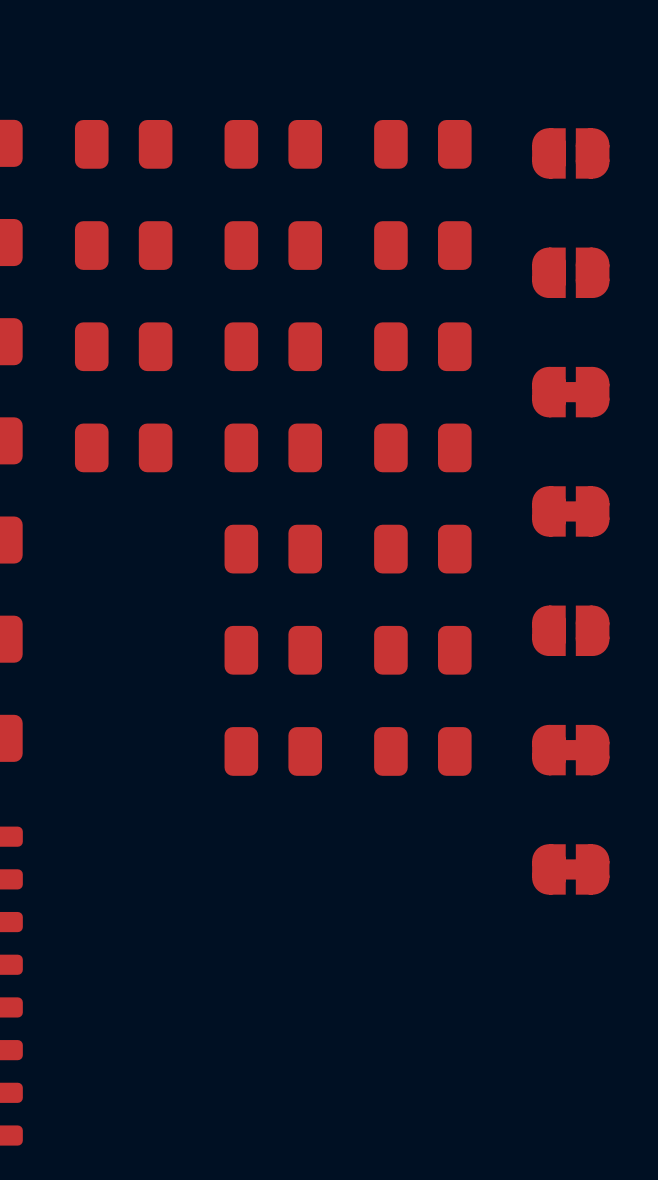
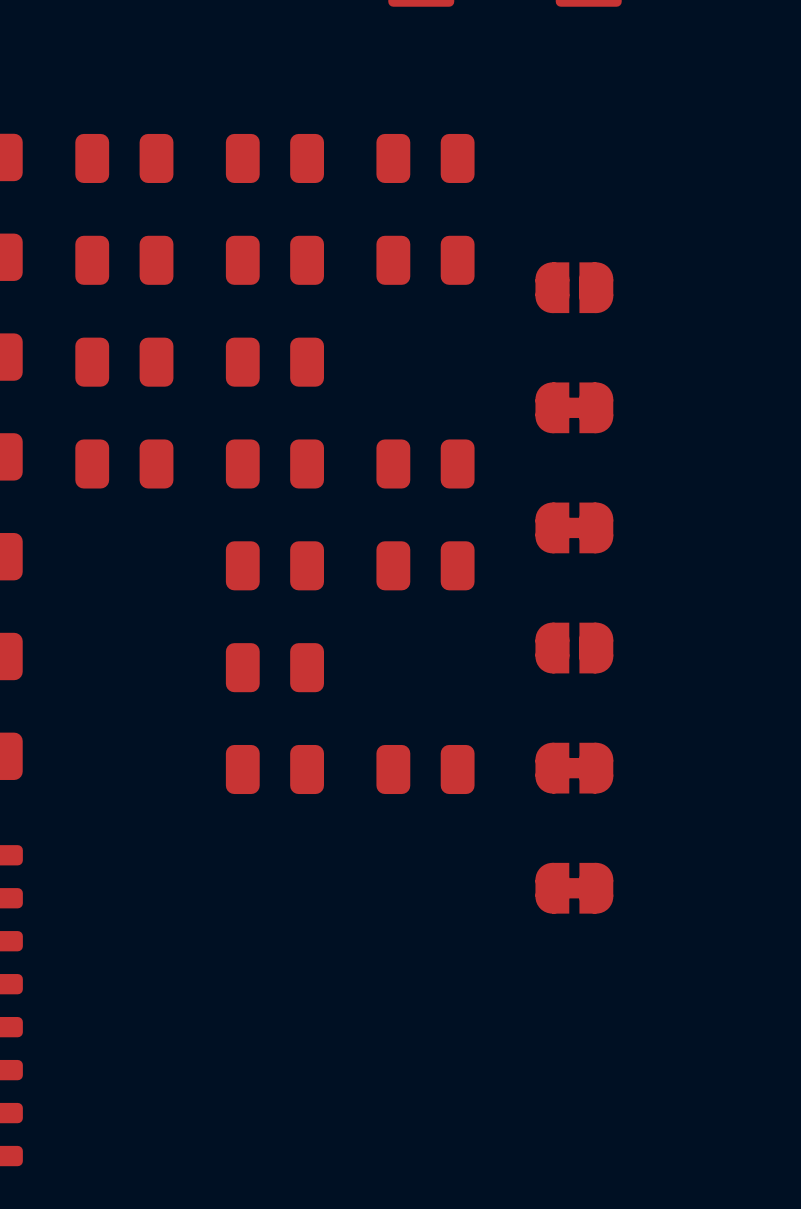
part: (570, 153) -> none
part: (422, 346) -> none
part: (422, 650) -> none

